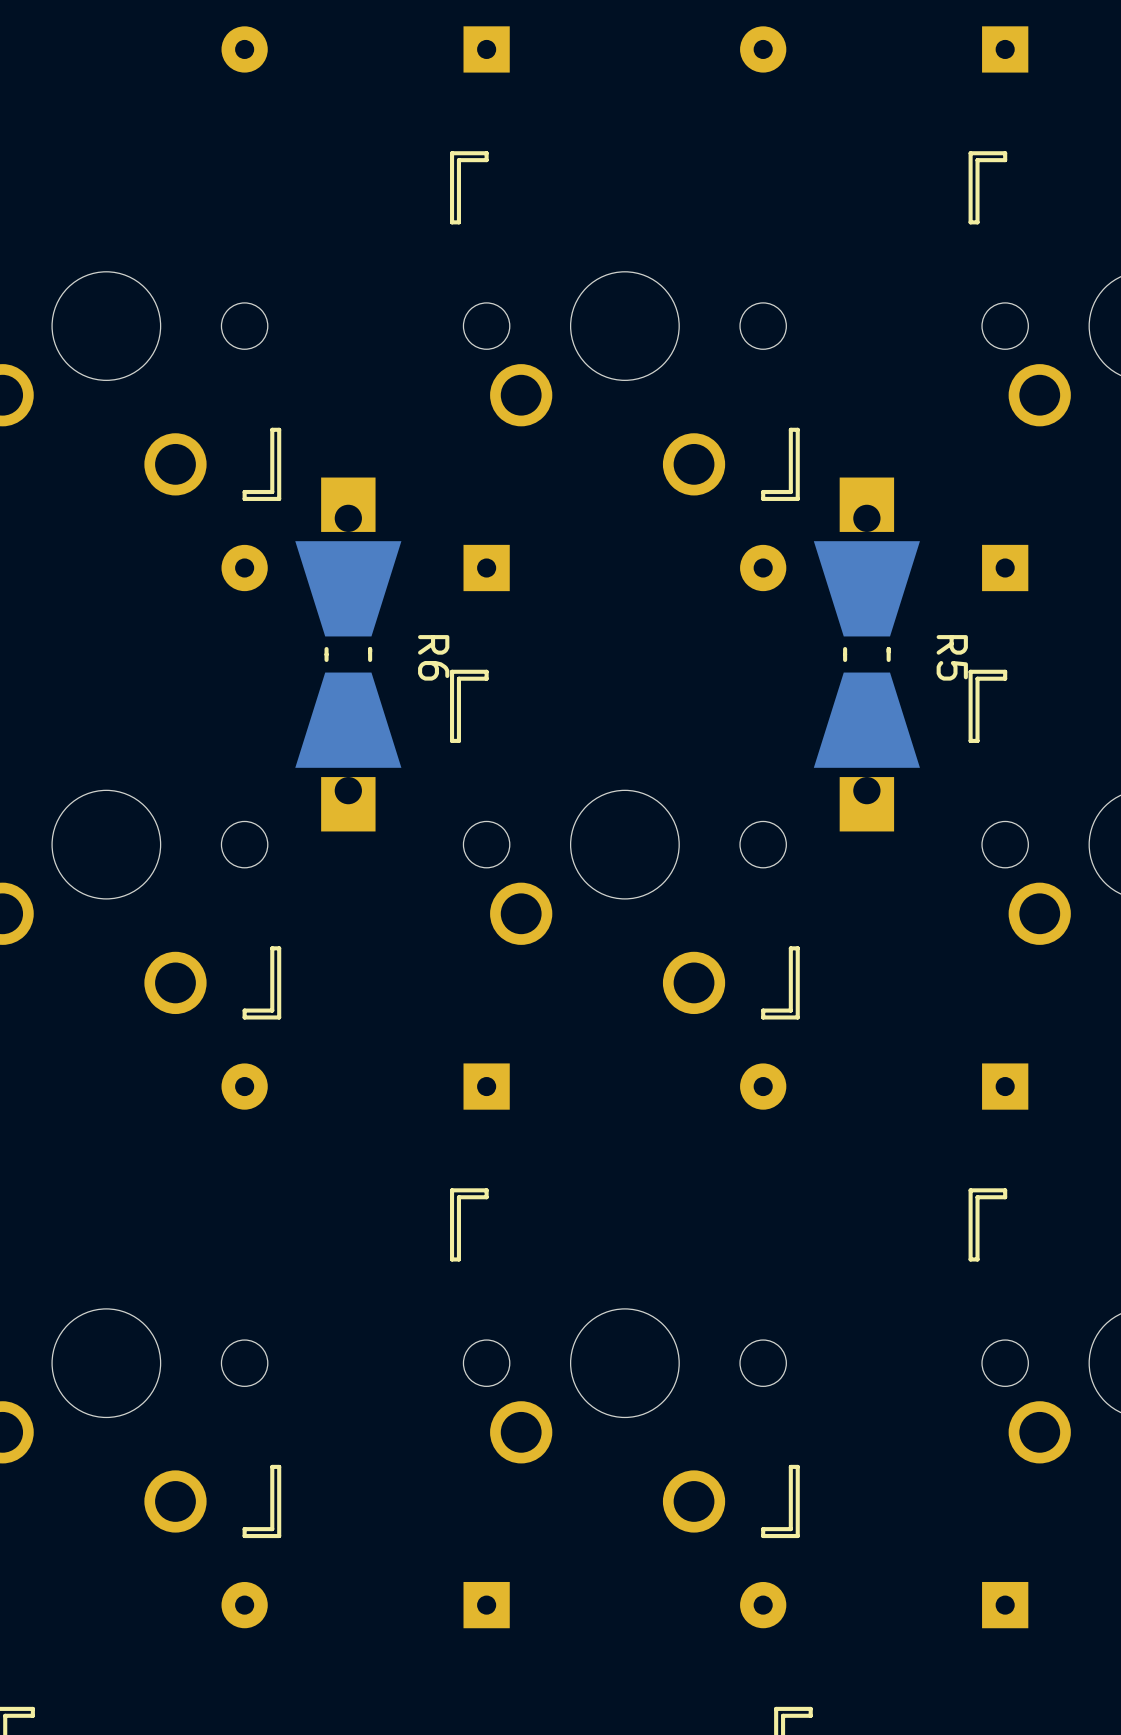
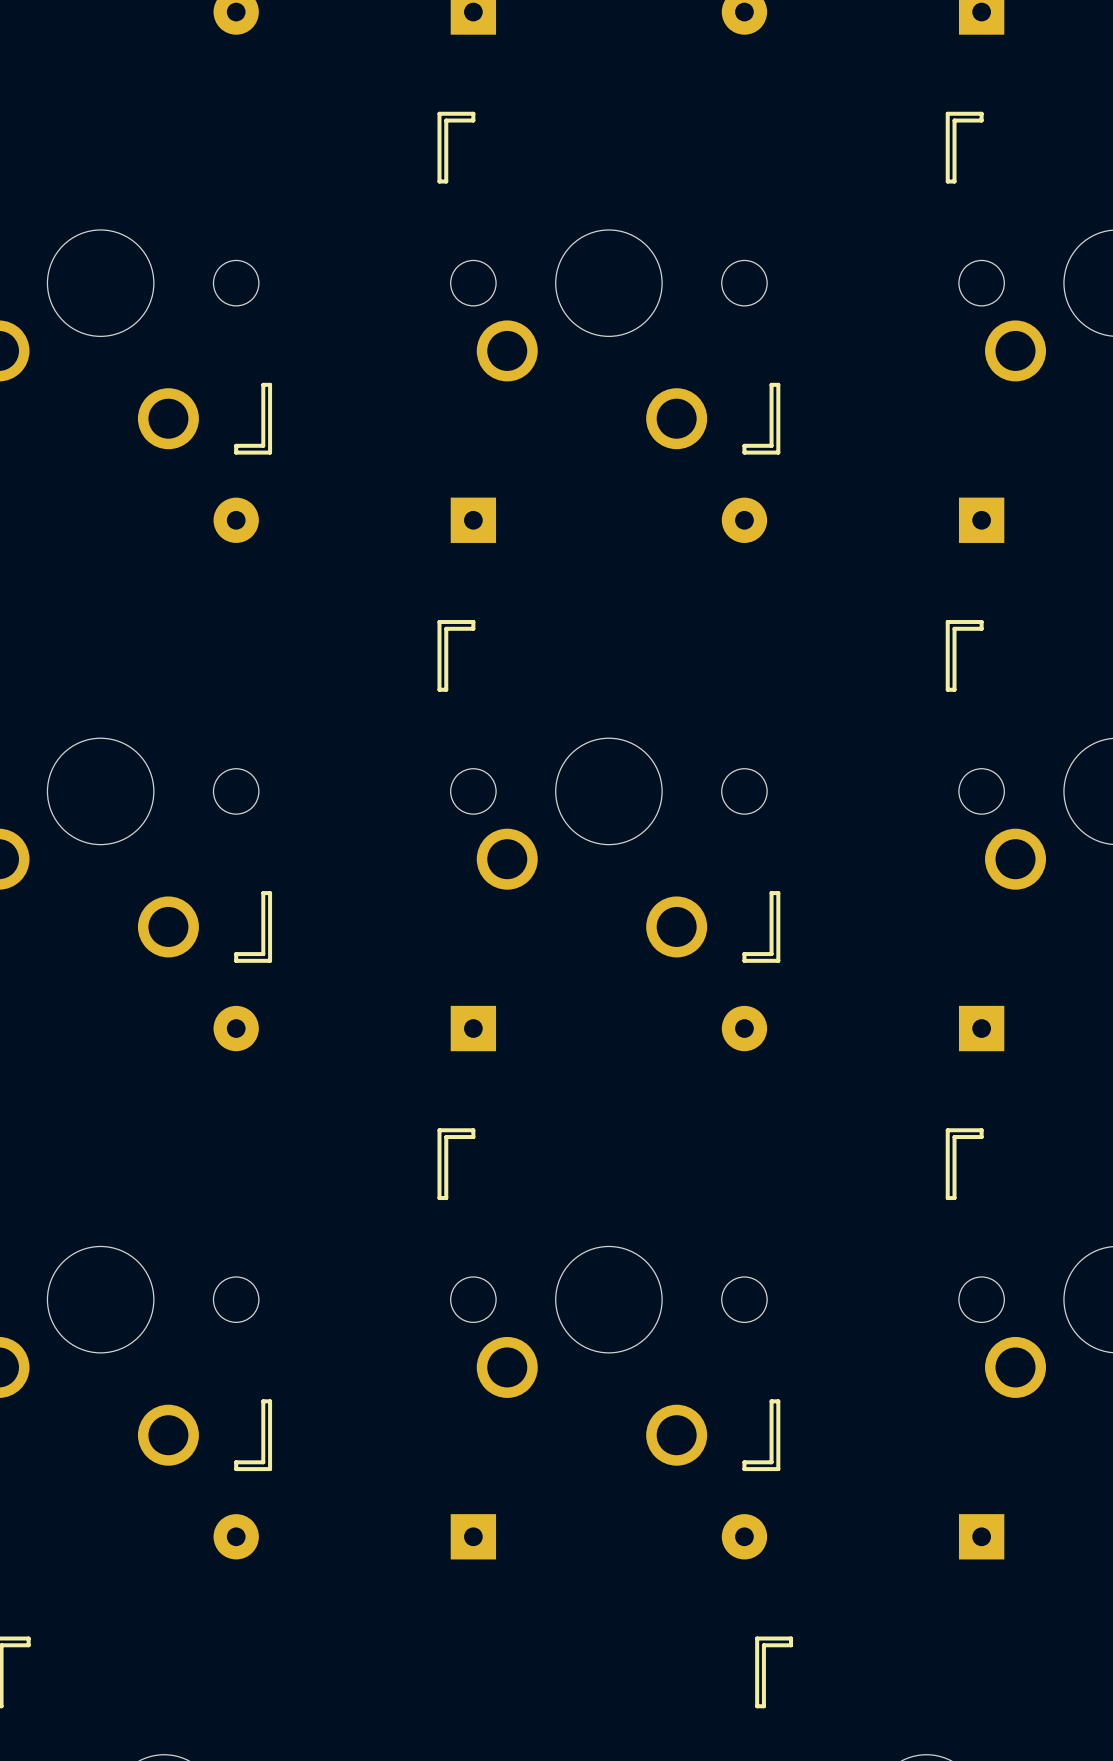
R6: (348, 654) -> none
R5: (866, 654) -> none

